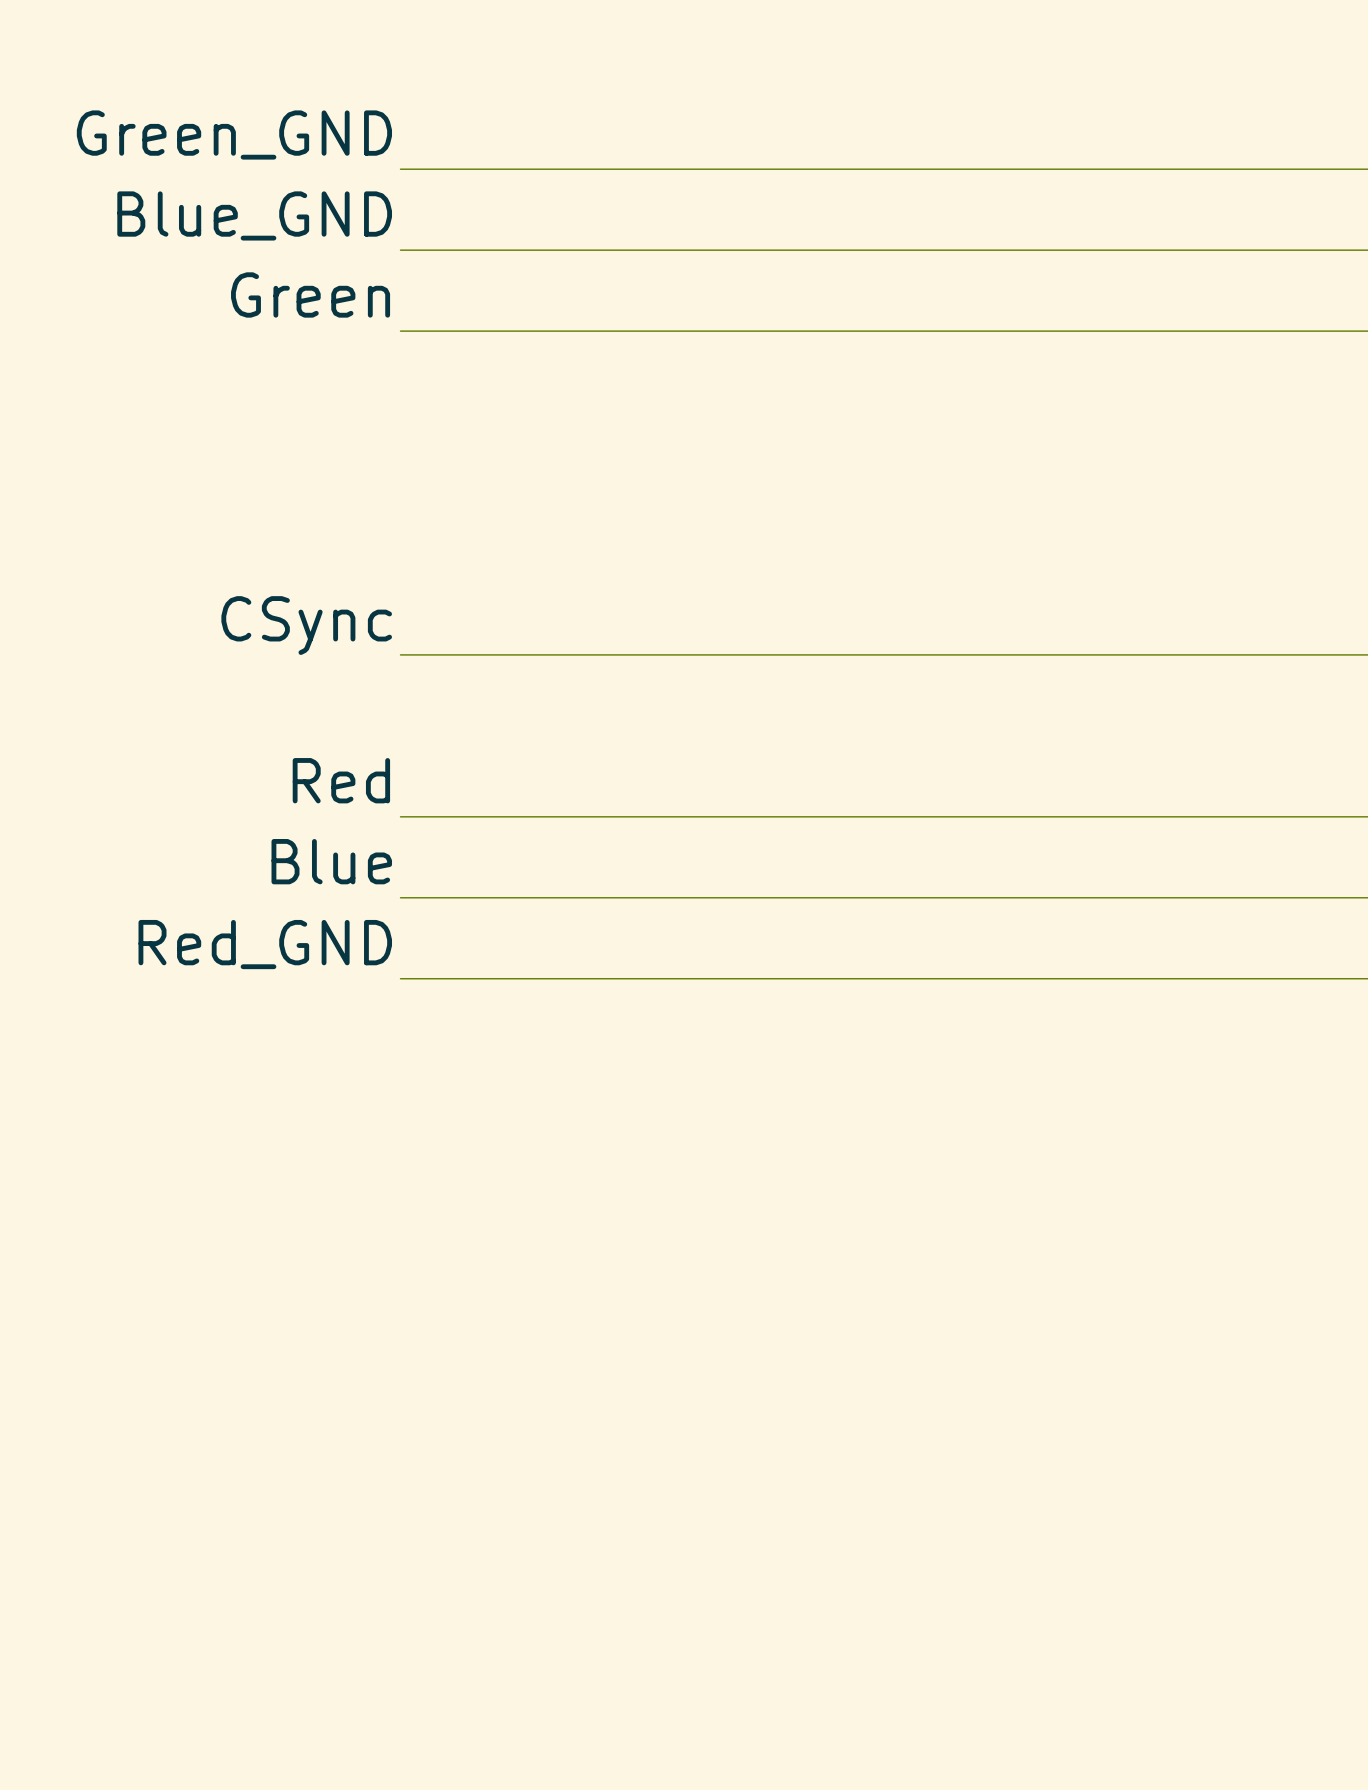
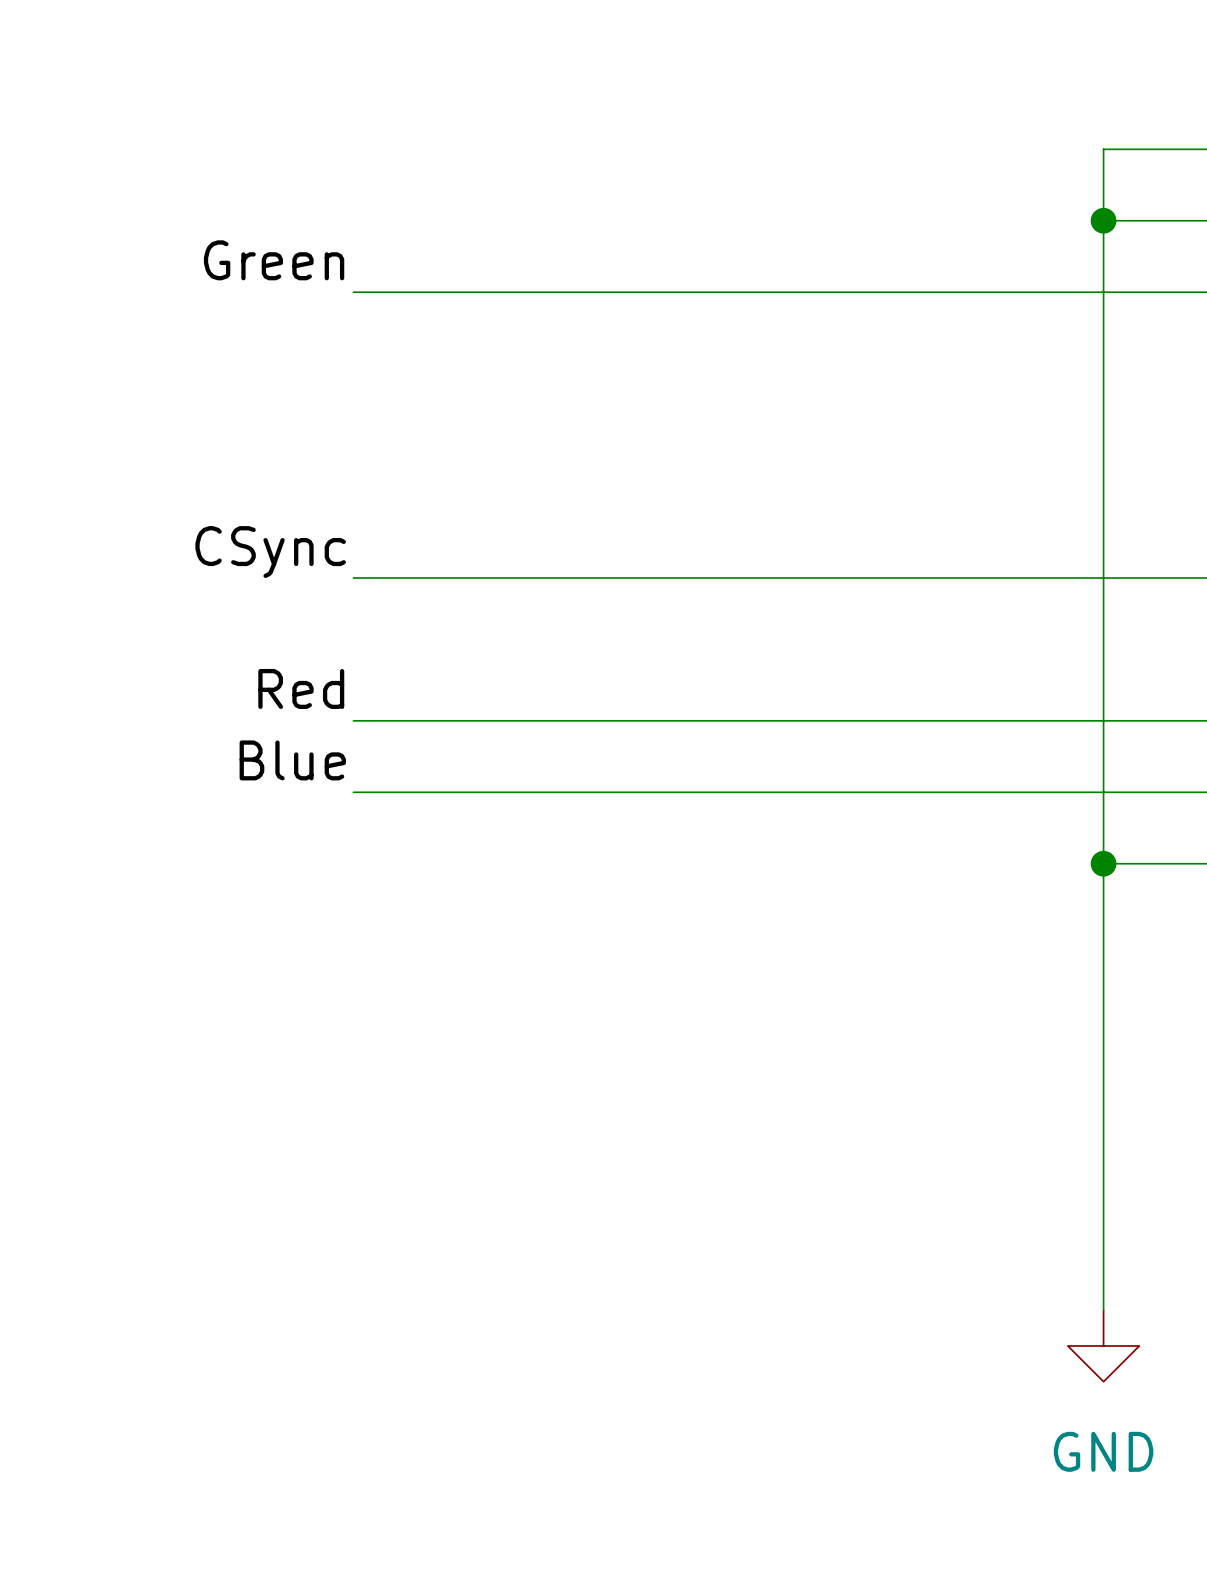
label: Green_GND (234, 135) -> none
wire: (400, 169) (1250, 169) -> (1103, 1310) (1103, 149)
label: Blue_GND (254, 215) -> none
wire: (400, 250) (1250, 250) -> none
junction: none -> (1103, 220)
label: Red_GND (265, 944) -> none
wire: (400, 978) (1250, 978) -> none
junction: none -> (1103, 863)
power symbol: none -> GND (1103, 1345)

